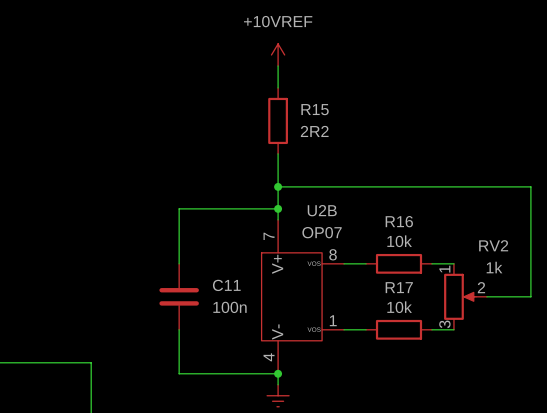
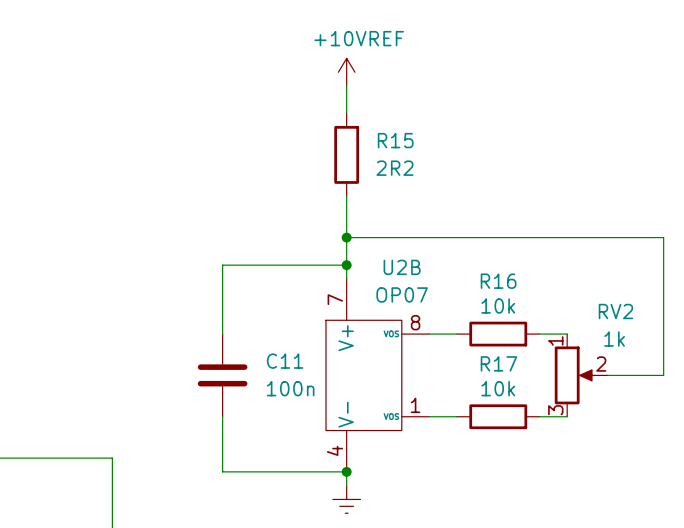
power symbol text position: +10VREF (278, 21) -> +10VREF (359, 38)

